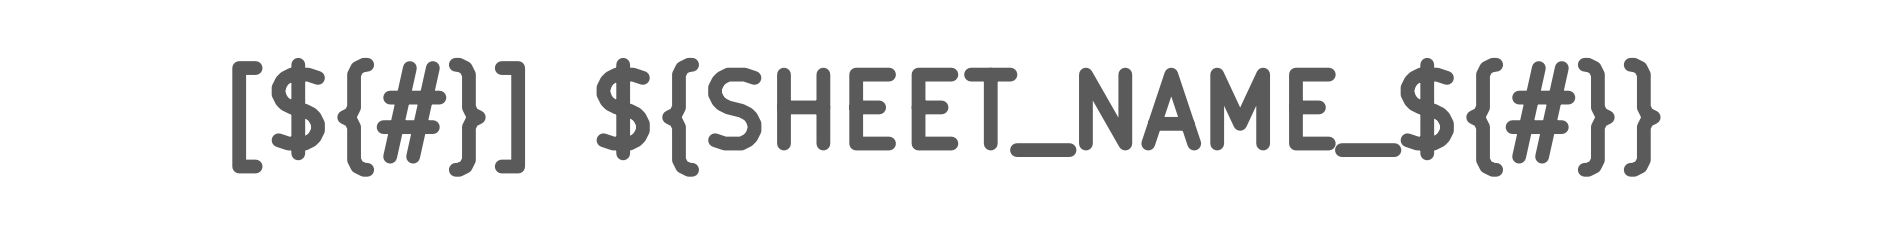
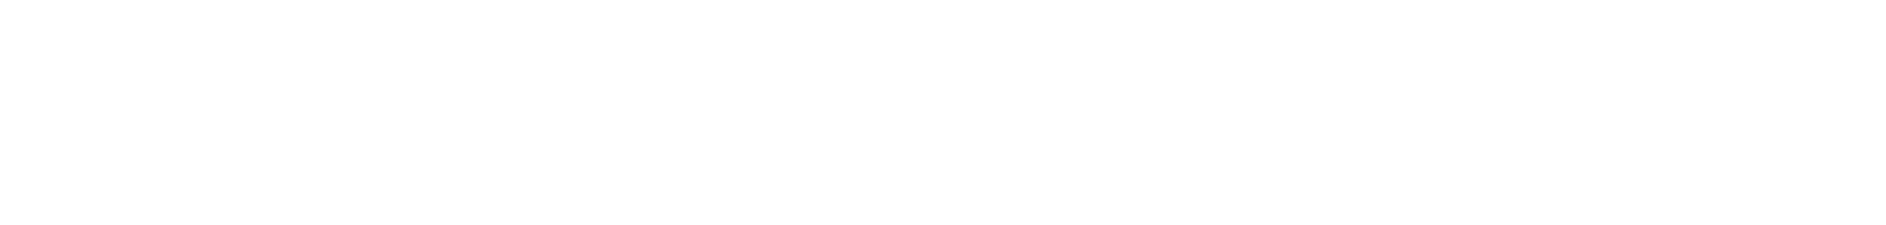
text: [${#}] ${SHEET_NAME_${#}} (946, 117) -> none

